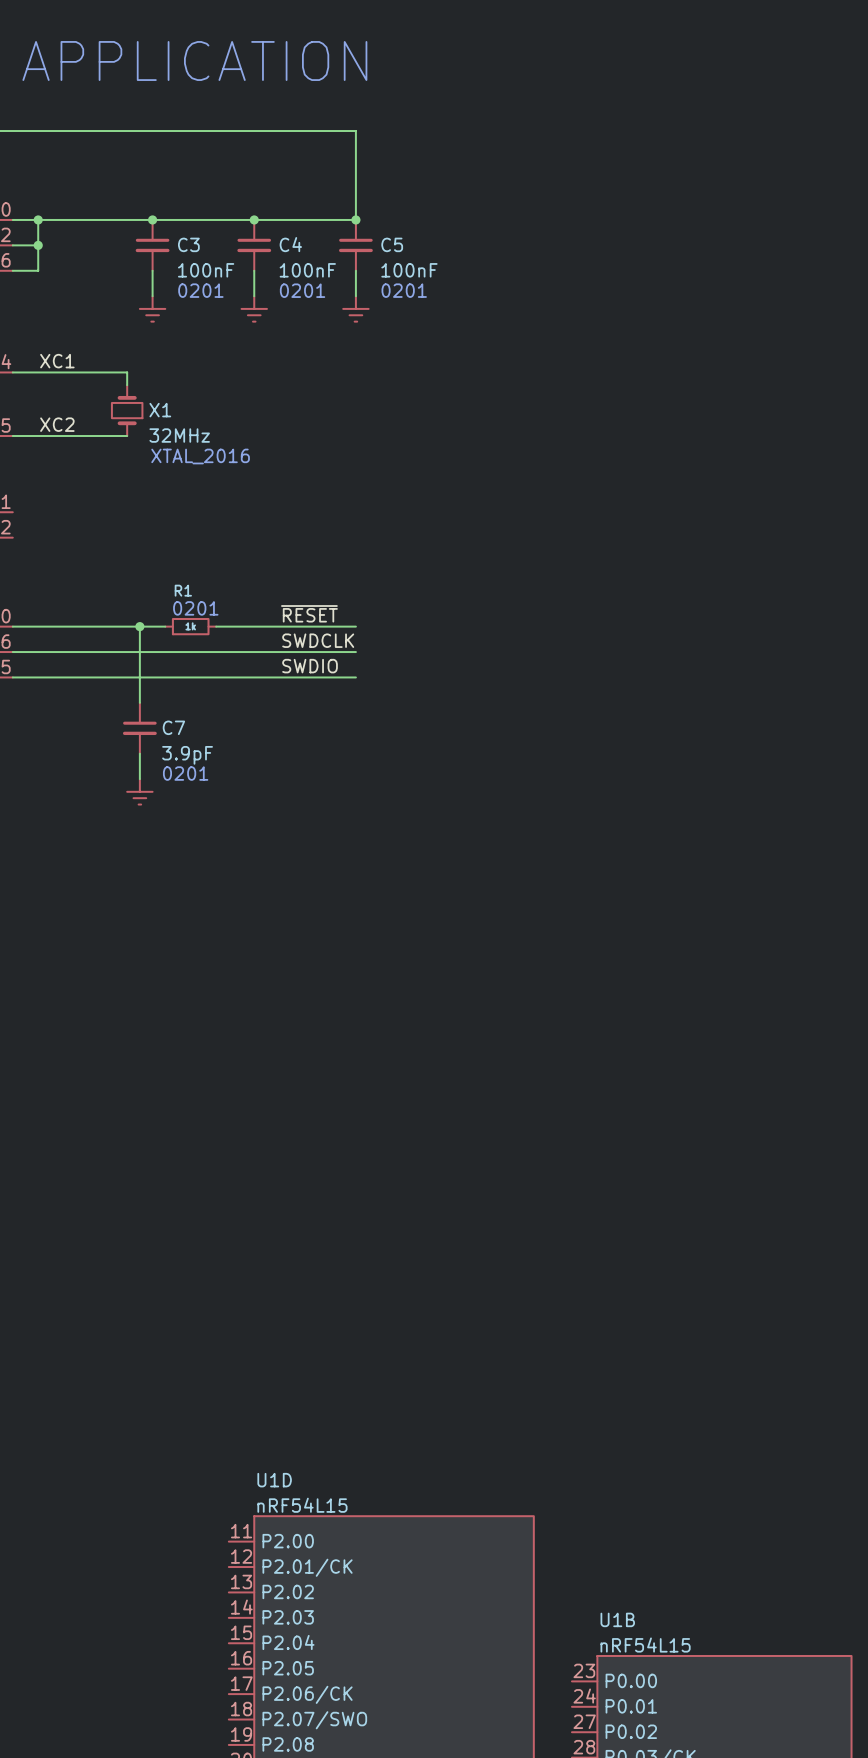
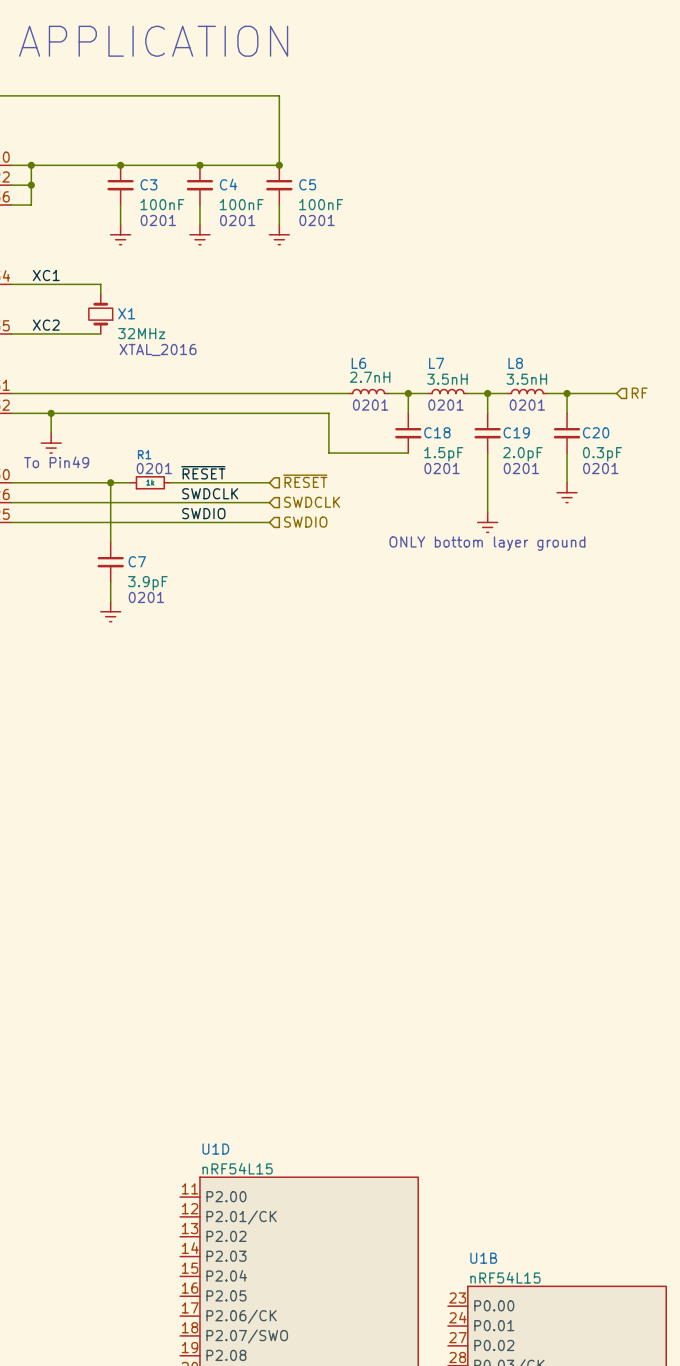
L6: none -> 2.7nH (368, 391)
L7: none -> 3.5nH (447, 391)
L8: none -> 3.5nH (527, 391)
hierarchical label: none -> RF (639, 393)
wire: none -> (11, 393) (348, 393)
wire: none -> (388, 393) (428, 393)
wire: none -> (408, 393) (408, 413)
junction: none -> (408, 393)
wire: none -> (467, 393) (507, 393)
wire: none -> (487, 393) (487, 413)
junction: none -> (487, 393)
wire: none -> (547, 393) (616, 393)
wire: none -> (567, 393) (567, 413)
junction: none -> (567, 393)
text: none -> 0201 (370, 405)
text: none -> 0201 (445, 405)
text: none -> 0201 (527, 405)
wire: none -> (11, 413) (328, 413) (328, 453) (408, 453)
wire: none -> (51, 413) (51, 433)
junction: none -> (51, 413)
C18: none -> 1.5pF (408, 433)
C19: none -> 2.0pF (487, 433)
C20: none -> 0.3pF (567, 433)
power symbol: none -> (51, 443)
wire: none -> (487, 453) (487, 512)
wire: none -> (567, 453) (567, 482)
text: none -> To Pin49 (56, 462)
text: none -> 0201 (442, 468)
text: none -> 0201 (521, 468)
text: none -> 0201 (600, 468)
label position: ~{RESET} (309, 613) -> ~{RESET} (203, 472)
hierarchical label: none -> ~{RESET} (305, 481)
wire: (343, 626) (355, 626) -> none
power symbol: none -> (567, 492)
label position: SWDCLK (318, 640) -> SWDCLK (210, 493)
hierarchical label: none -> SWDCLK (312, 502)
wire: (343, 652) (355, 652) -> none
label position: SWDIO (310, 666) -> SWDIO (203, 513)
hierarchical label: none -> SWDIO (305, 522)
wire: (343, 677) (355, 677) -> none
power symbol: none -> (487, 522)
text: none -> ONLY bottom layer ground (487, 543)

